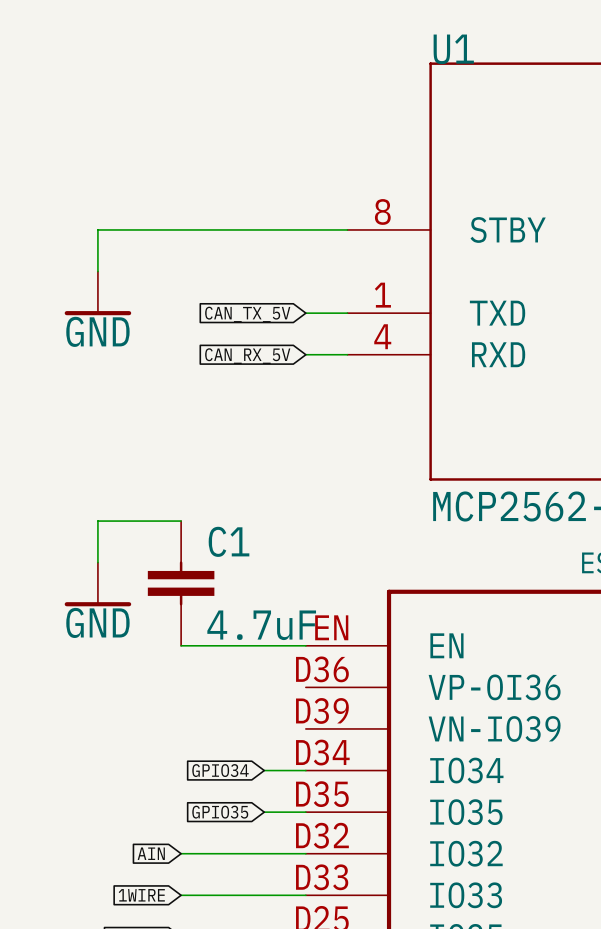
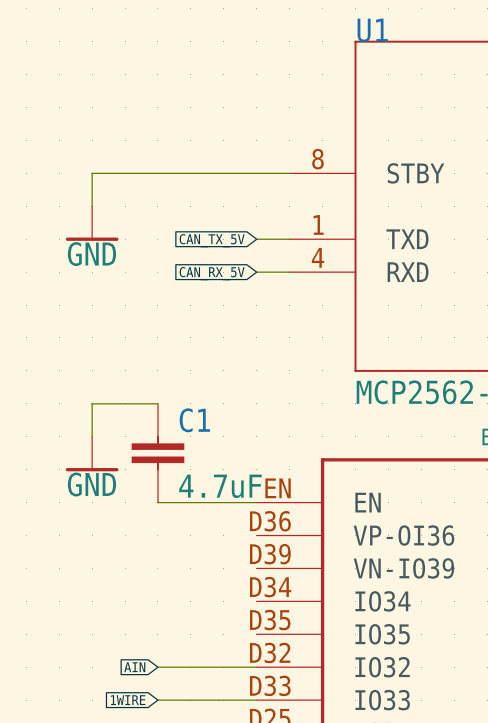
global label: GPIO34 (220, 770) -> none
wire: (264, 770) (305, 770) -> none
global label: GPIO35 (220, 812) -> none
wire: (264, 812) (305, 812) -> none

